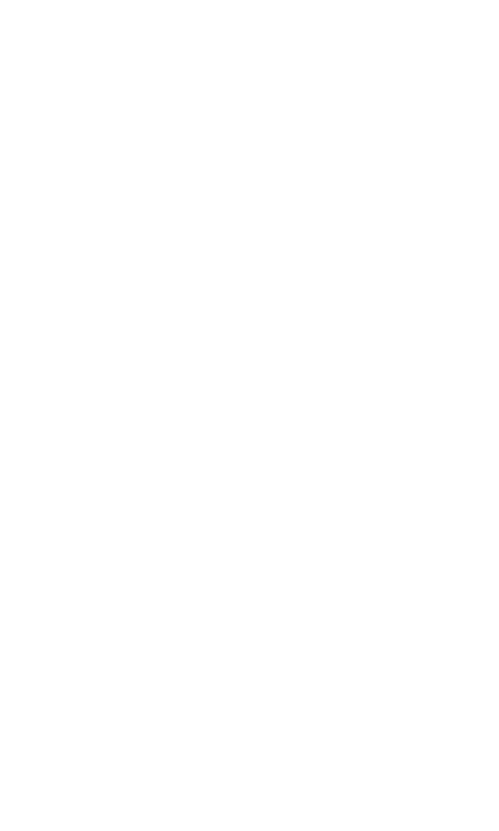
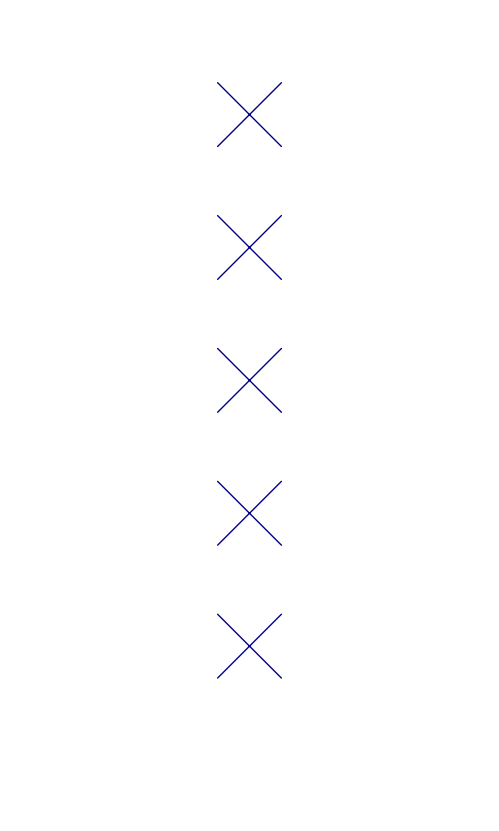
no-connect mark: none -> (249, 114)
no-connect mark: none -> (249, 247)
no-connect mark: none -> (249, 380)
no-connect mark: none -> (249, 513)
no-connect mark: none -> (249, 646)

